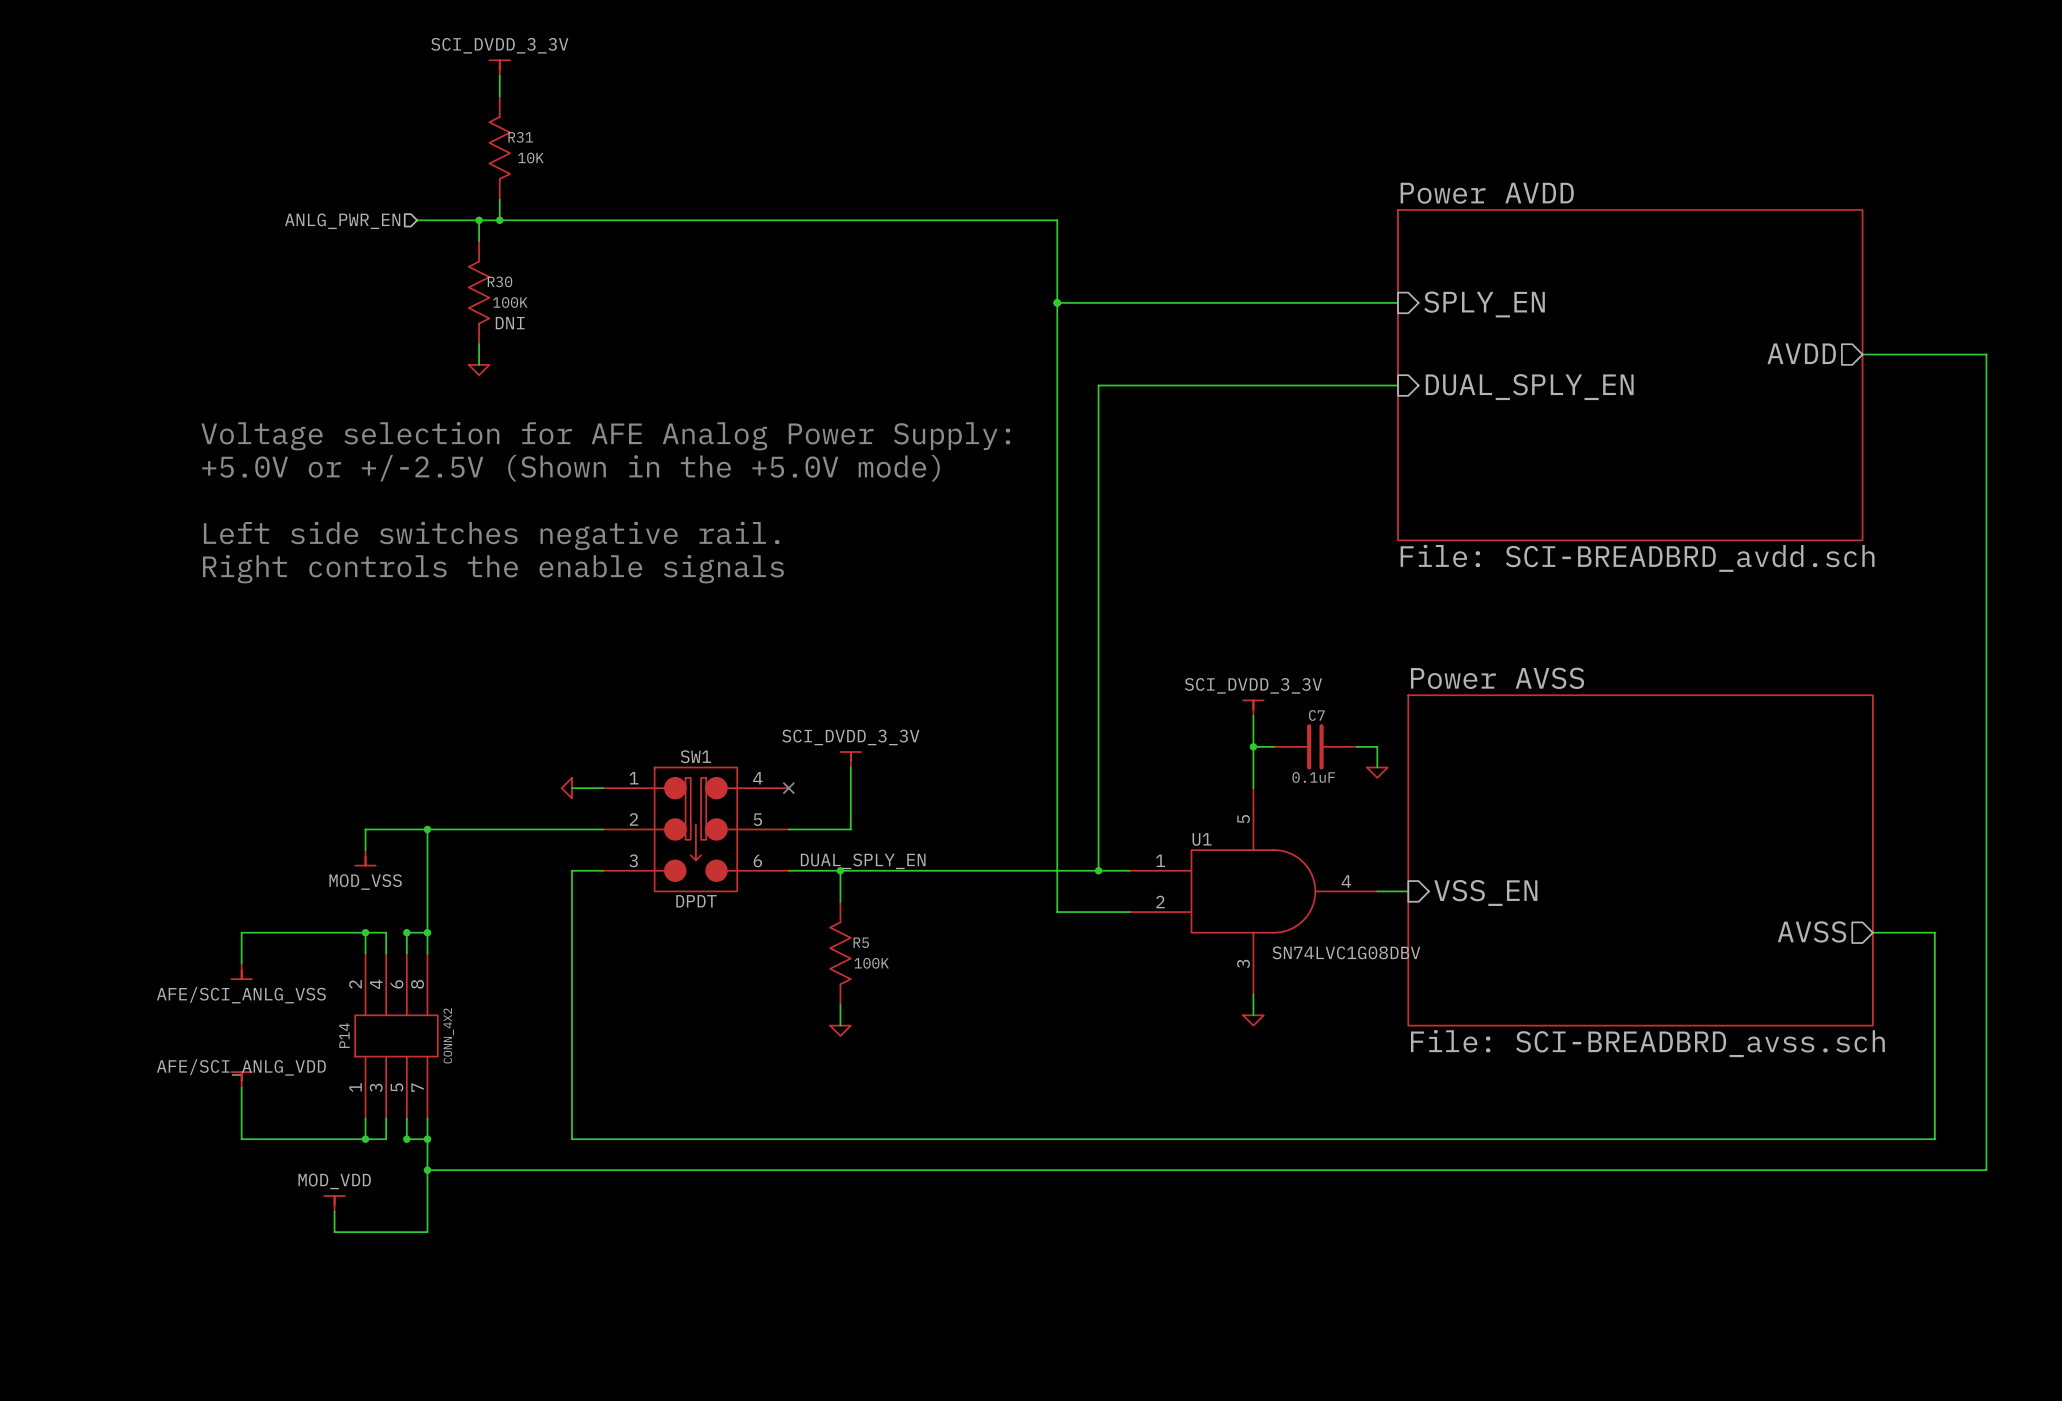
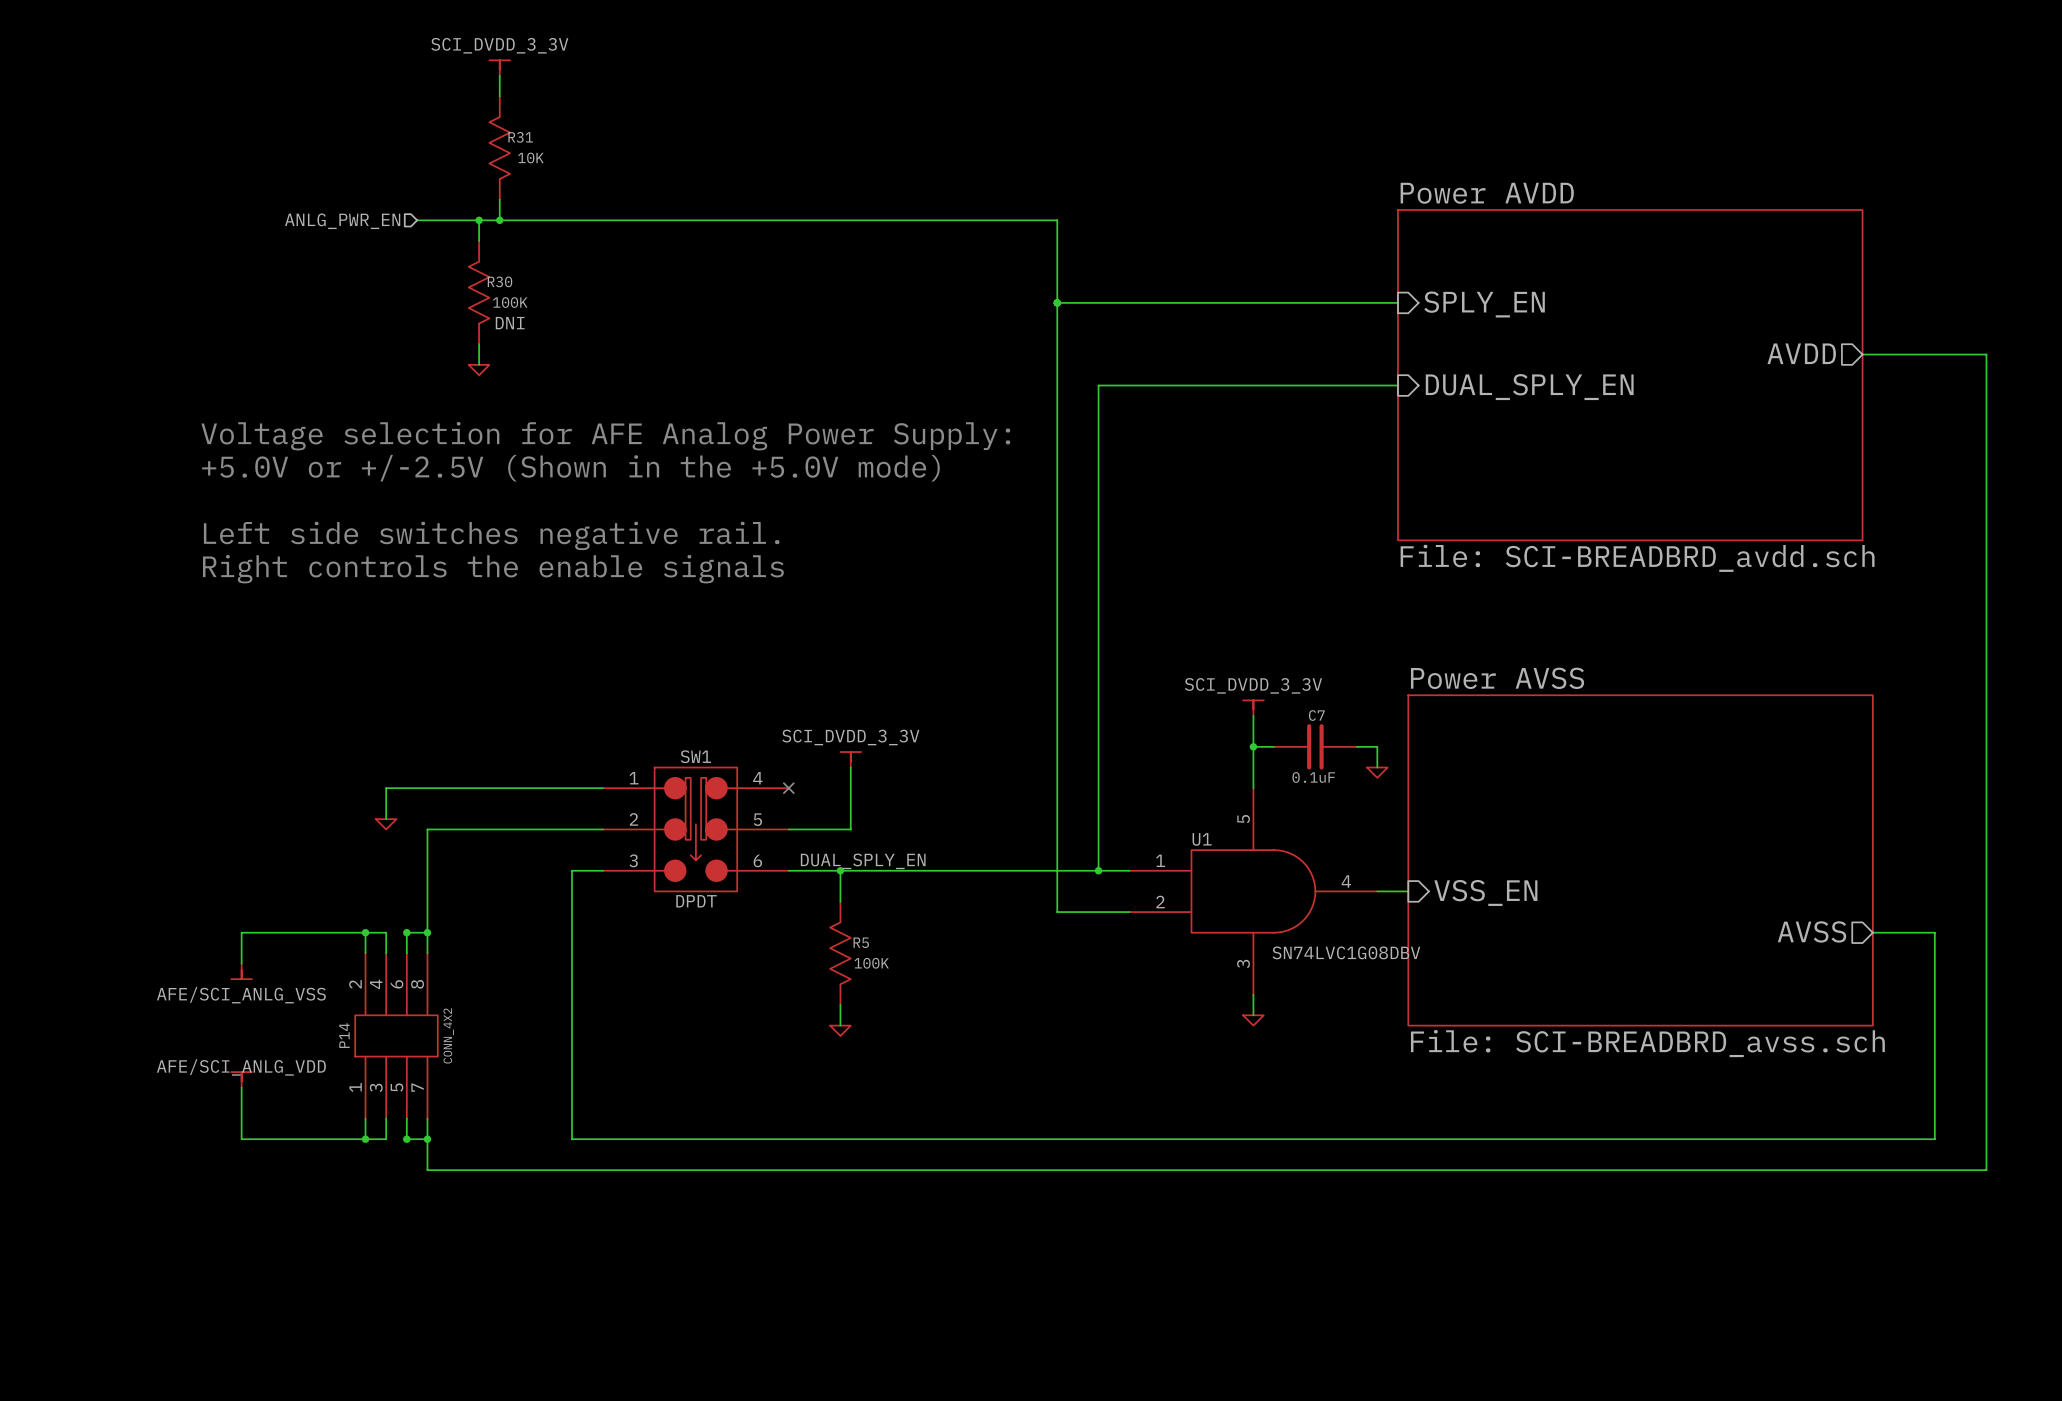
power symbol rotation: 0° (566, 788) -> 90° counterclockwise (386, 824)
power symbol position: (566, 788) -> (386, 824)
wire: none -> (572, 788) (386, 788) (386, 819)
wire: (427, 829) (365, 829) (365, 850) -> none
junction: (427, 829) -> none
power symbol: MOD_VSS (365, 857) -> none
wire: (427, 1170) (427, 1232) (334, 1232) (334, 1211) -> none
junction: (427, 1170) -> none
power symbol: MOD_VDD (334, 1203) -> none

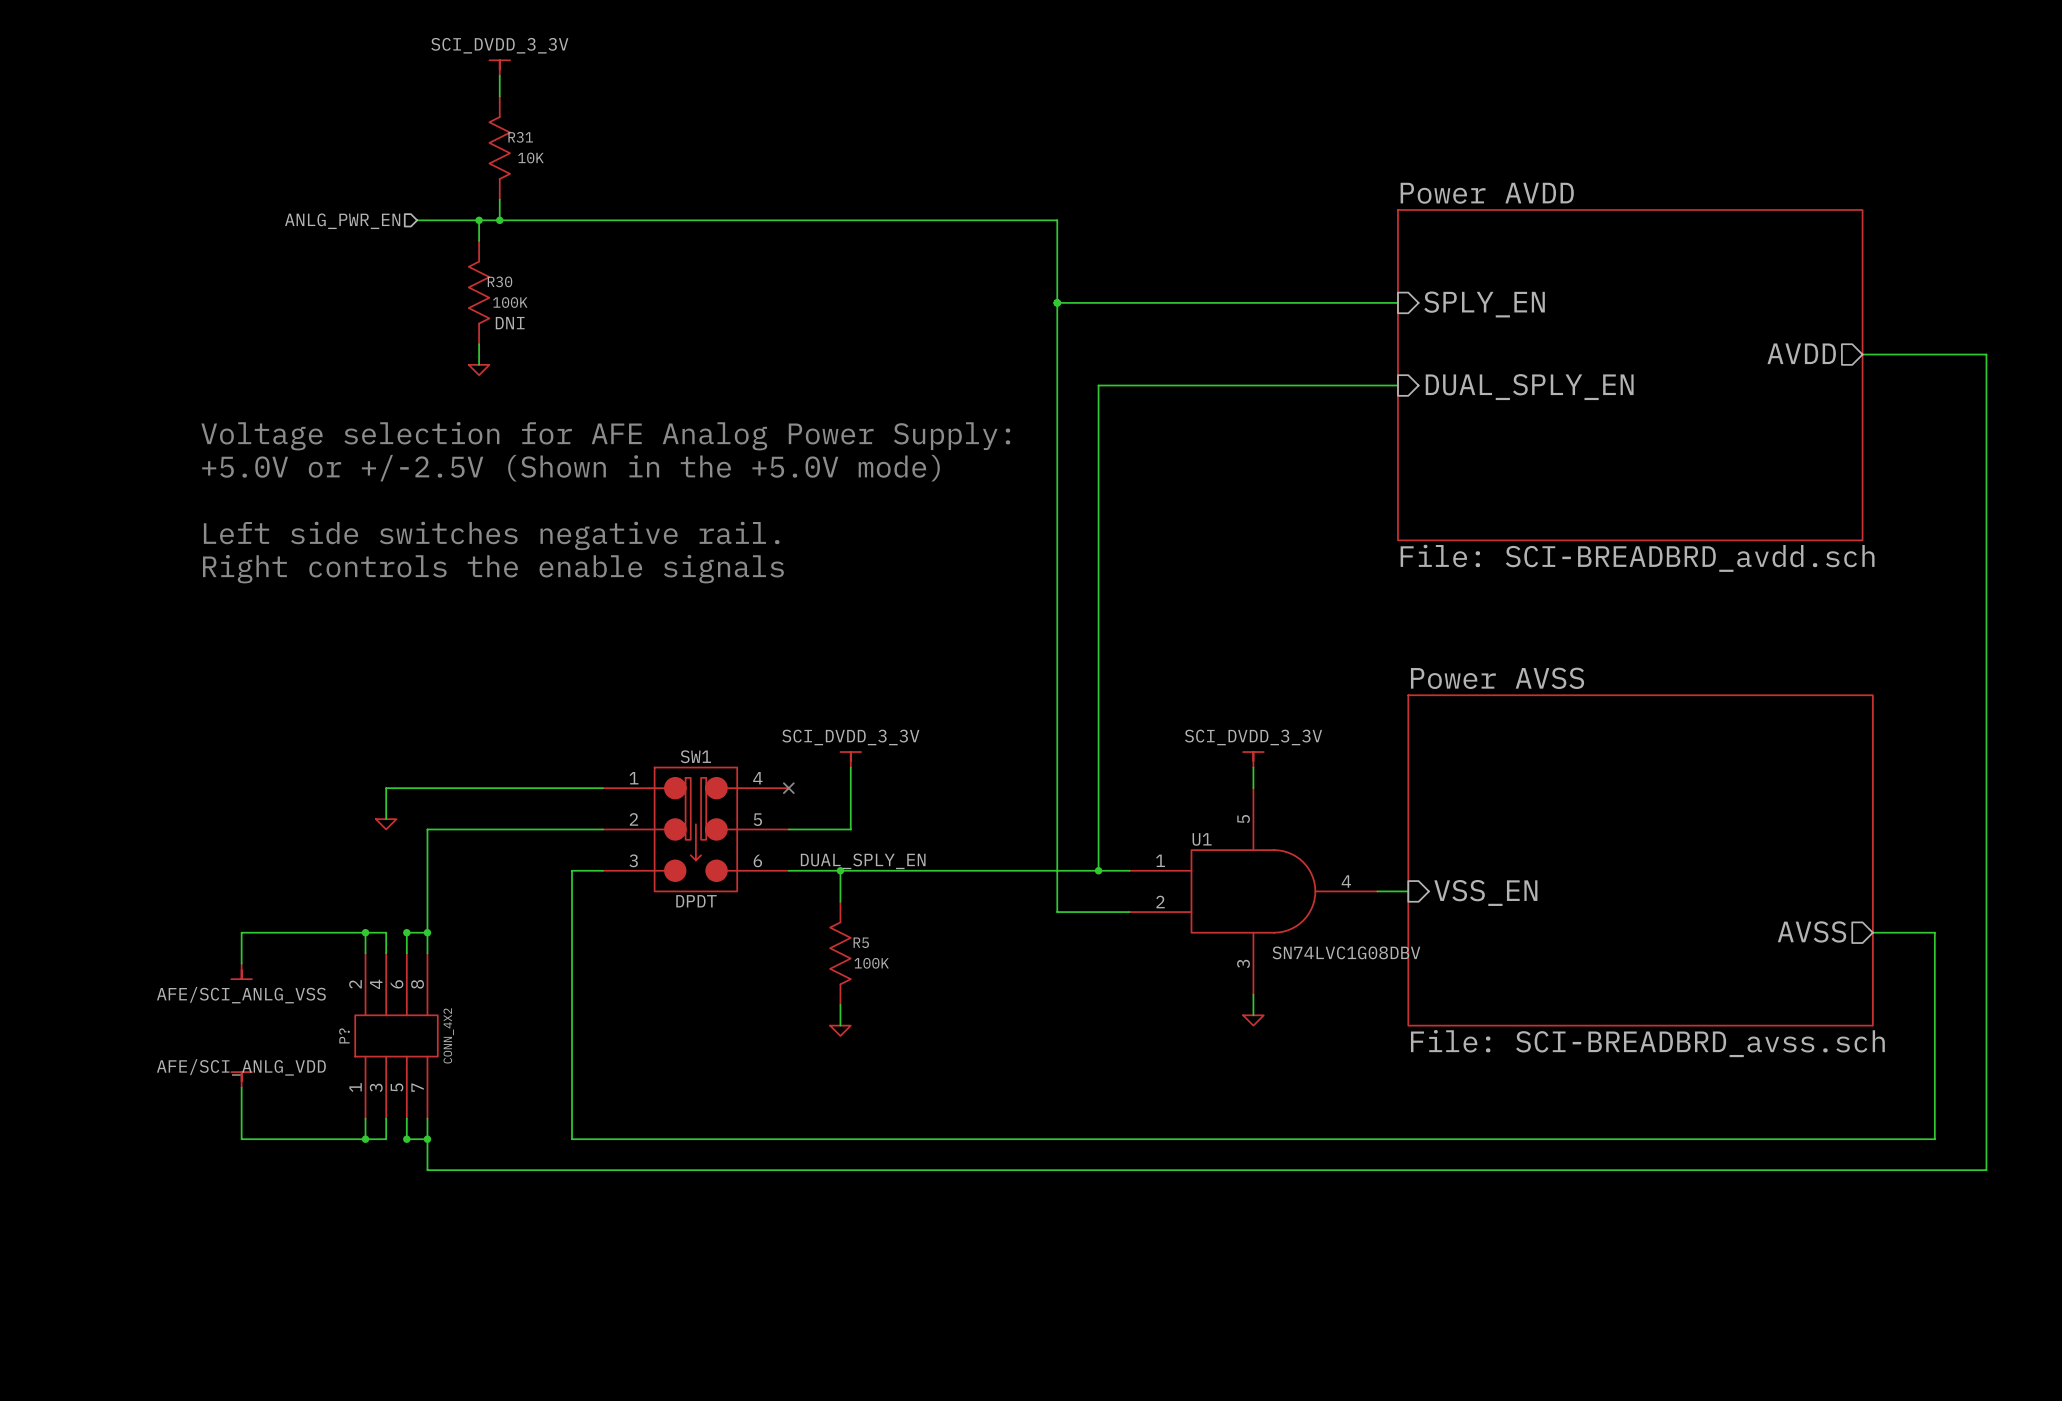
power symbol position: SCI_DVDD_3_3V (1253, 708) -> SCI_DVDD_3_3V (1253, 759)
wire: (1253, 715) (1253, 767) -> none
wire: (1253, 746) (1274, 746) -> none
junction: (1253, 746) -> none
C7: 0.1uF (1315, 746) -> none
wire: (1356, 746) (1377, 746) (1377, 767) -> none
power symbol: (1377, 772) -> none
P14 name: P14 (344, 1035) -> P? (344, 1035)

